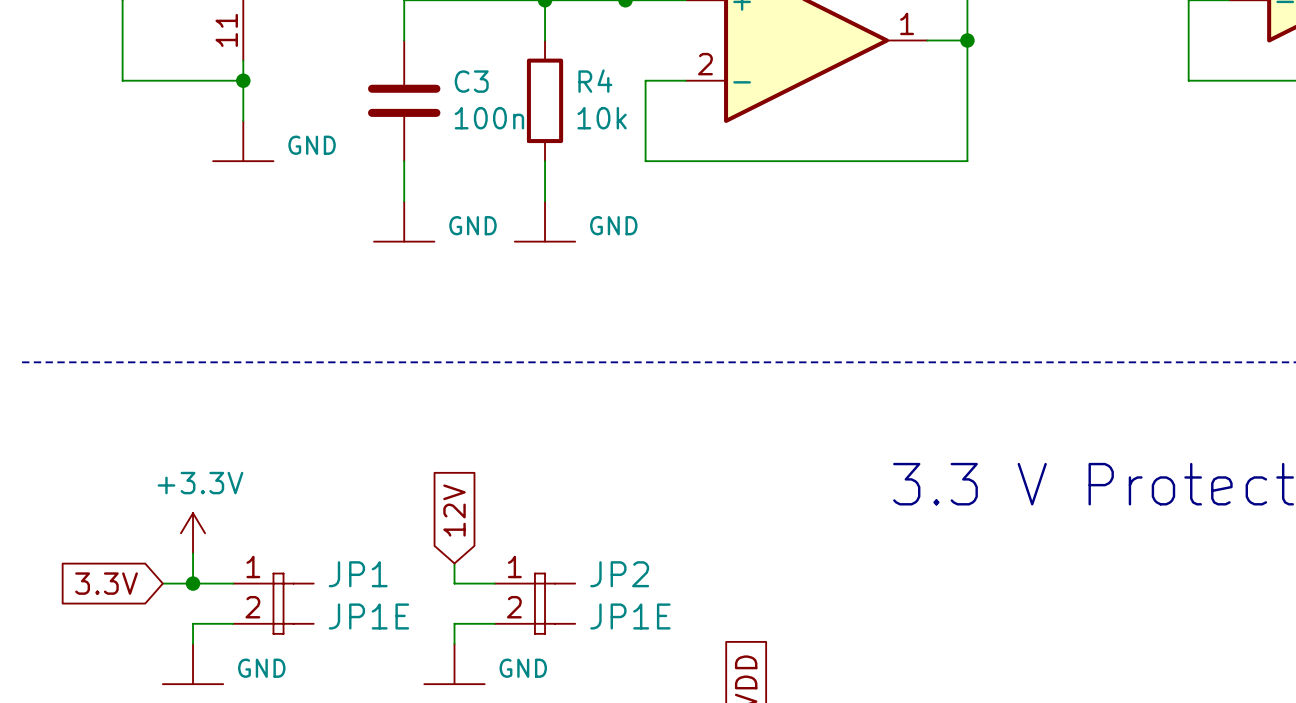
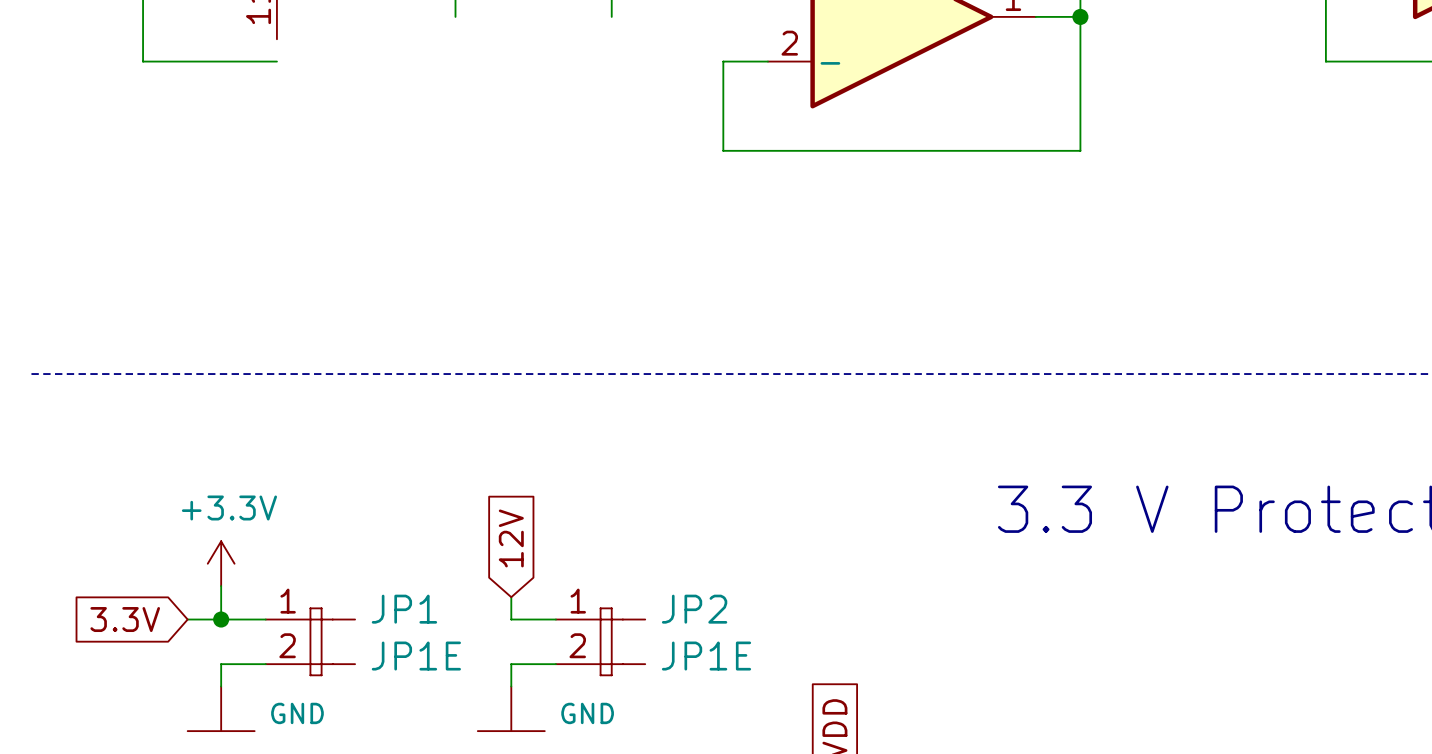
wire: (243, 60) (243, 120) -> none
junction: (243, 80) -> none
C3: 100n (404, 100) -> none
R4: 10k (545, 100) -> none
power symbol: GND (243, 141) -> none
wire: (404, 161) (404, 201) -> none
wire: (545, 161) (545, 201) -> none
power symbol: GND (404, 221) -> none
power symbol: GND (545, 221) -> none

